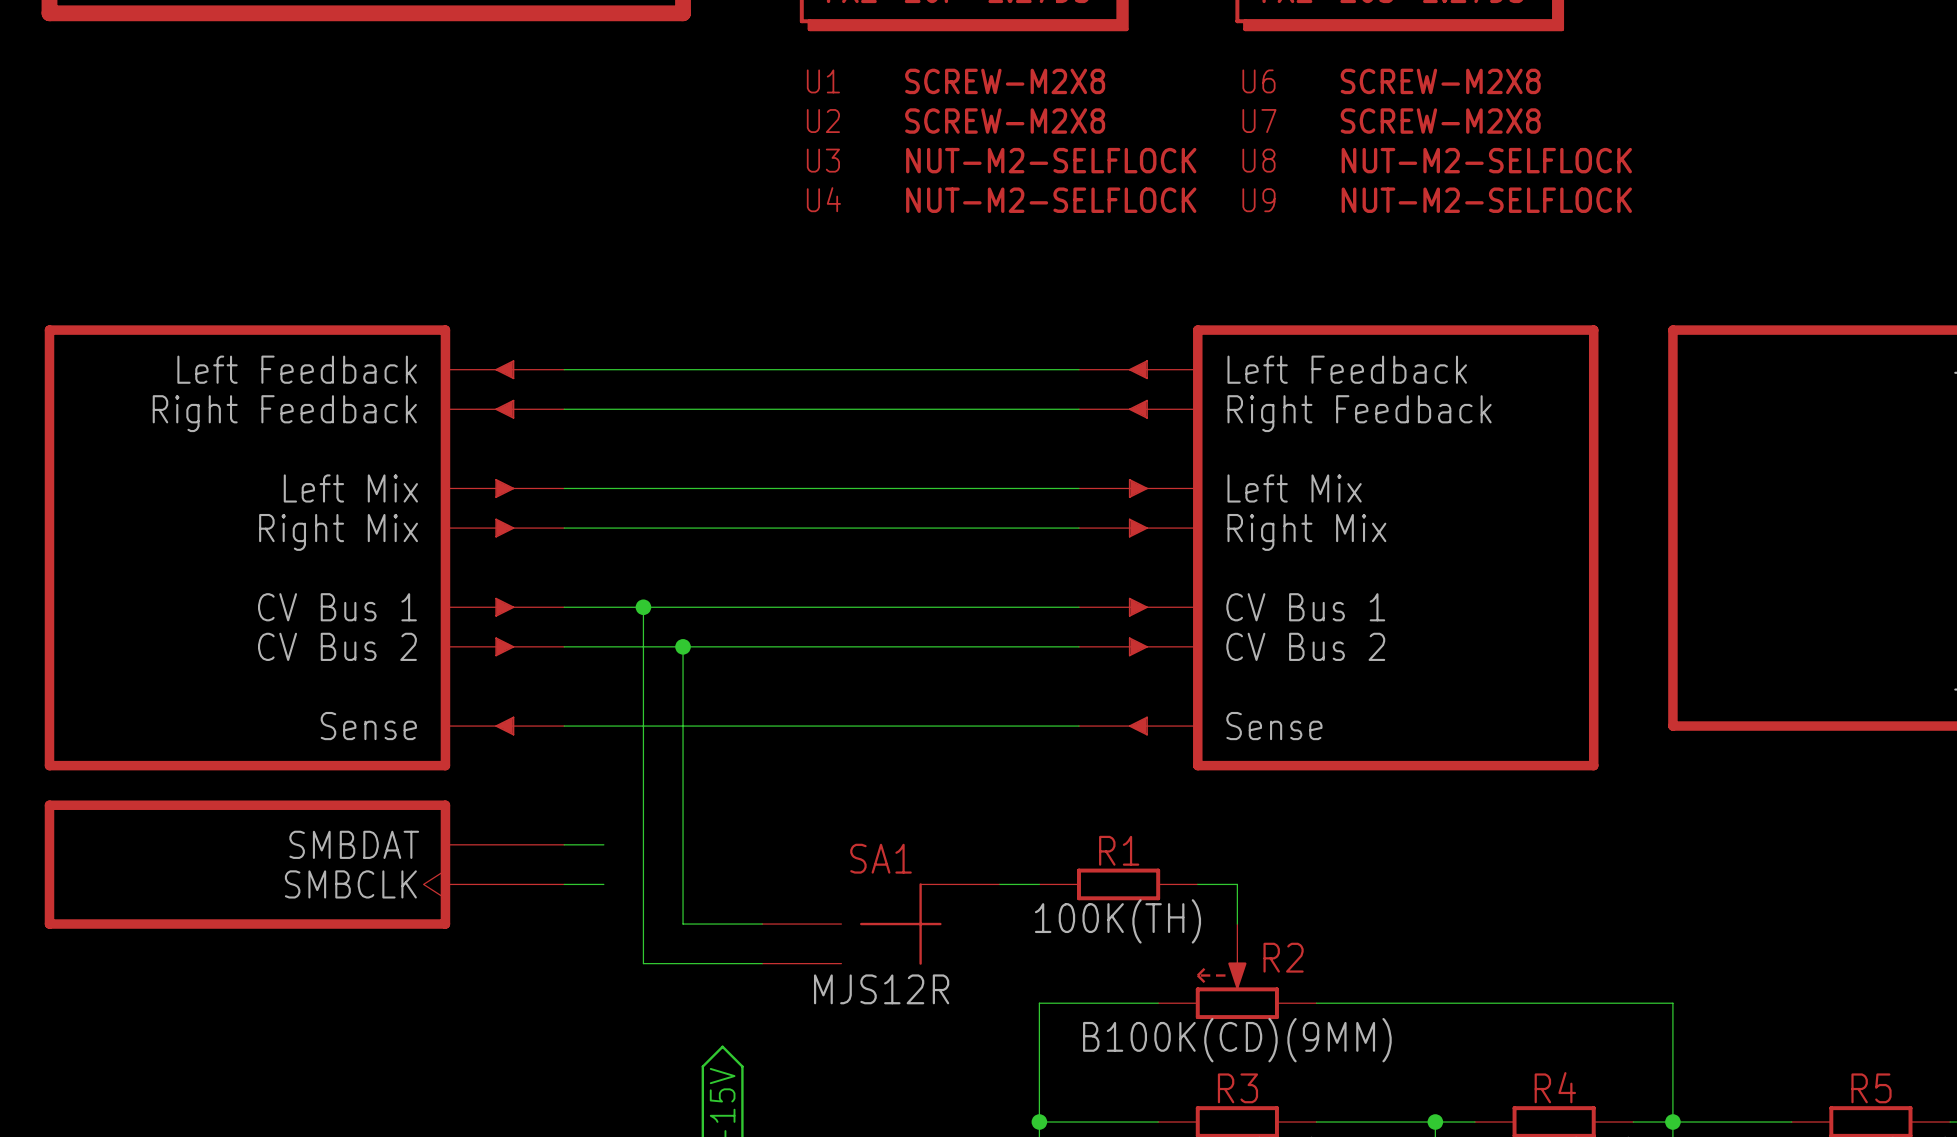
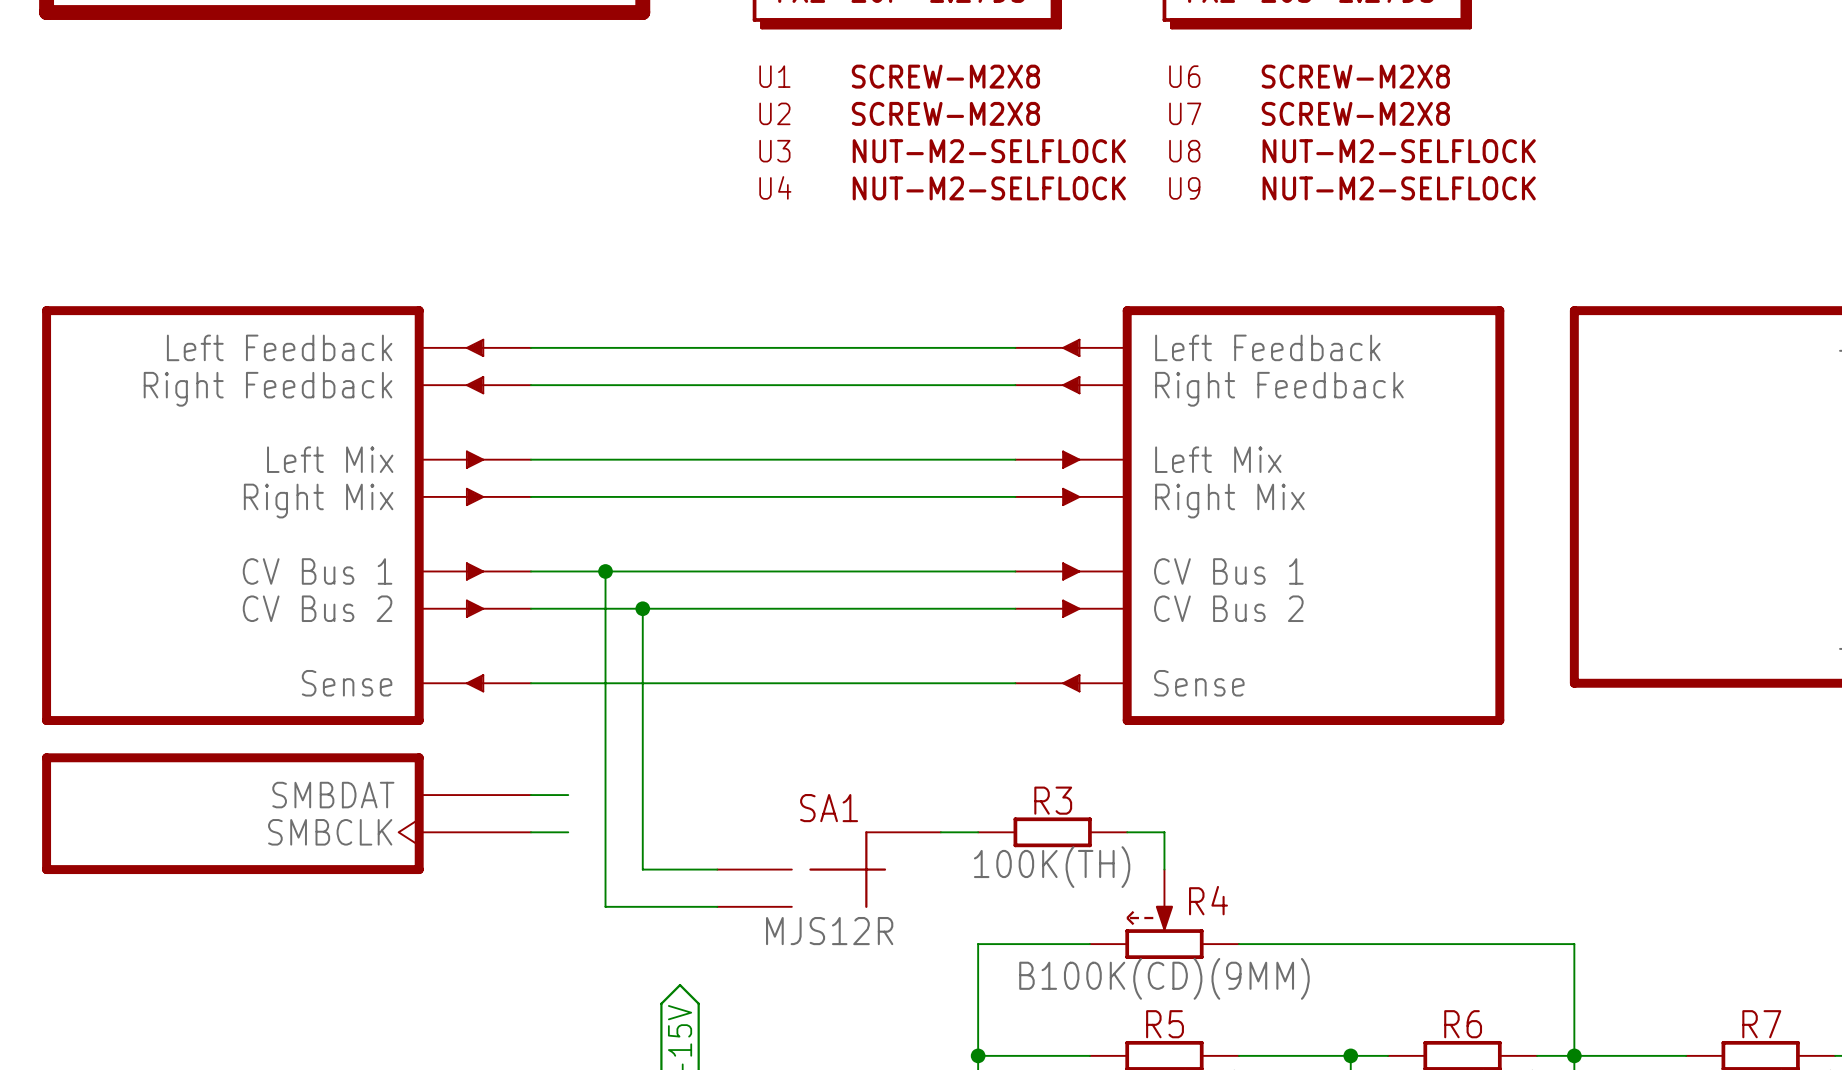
R1 name: R1 (1119, 850) -> R3 (1053, 800)
R2 name: R2 (1283, 957) -> R4 (1208, 900)
R4 name: R4 (1555, 1087) -> R6 (1463, 1024)
R3 name: R3 (1237, 1088) -> R5 (1165, 1024)
R5 name: R5 (1871, 1088) -> R7 (1761, 1024)

